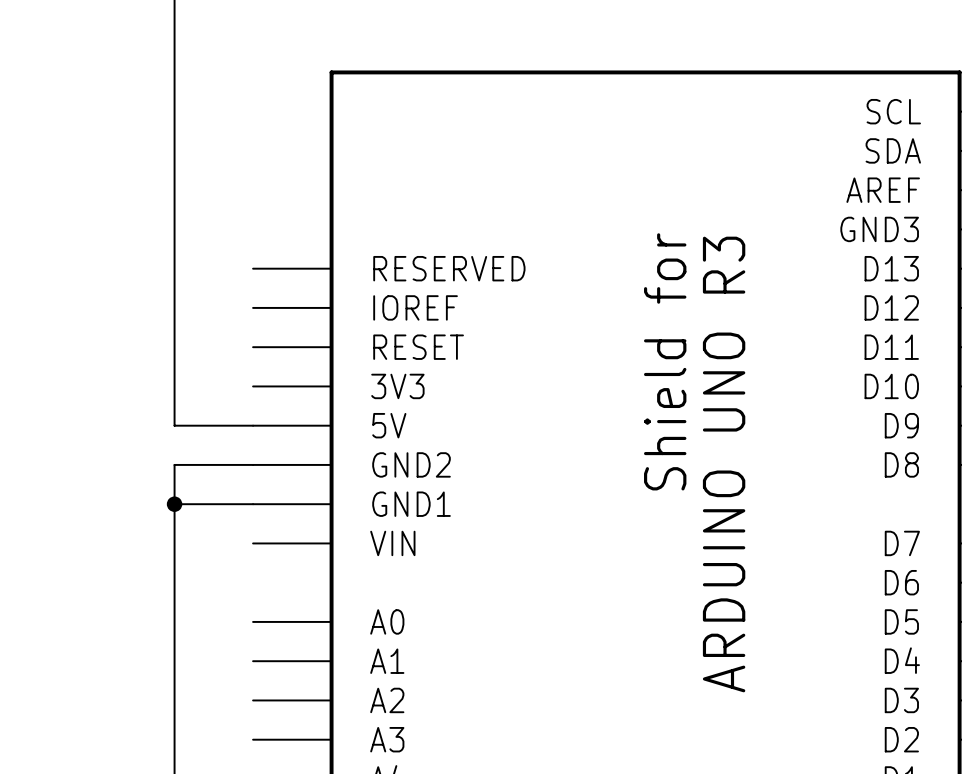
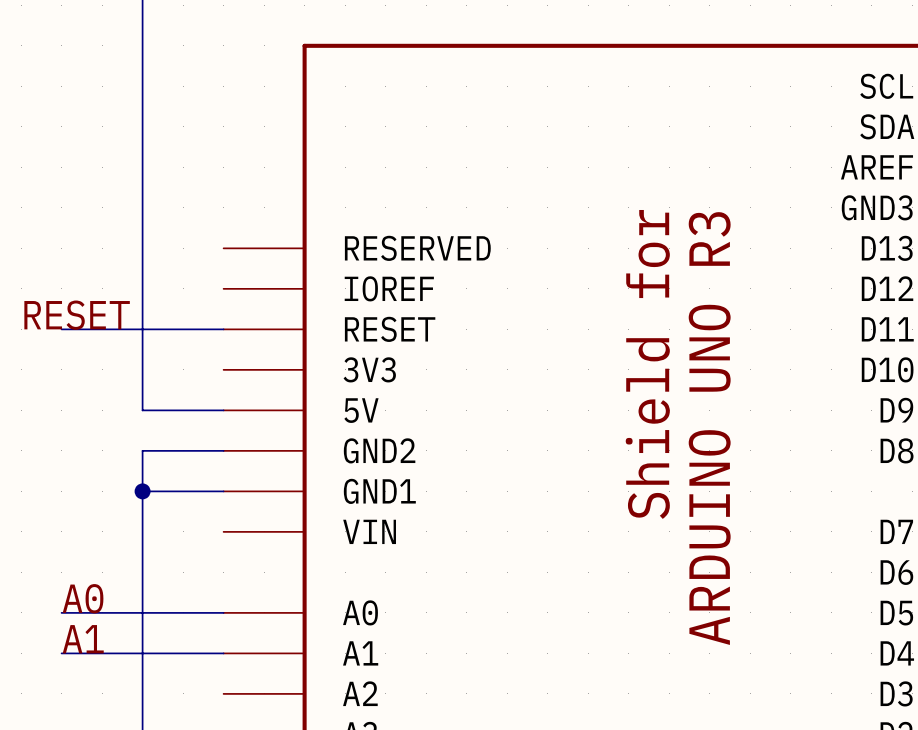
label: none -> RESET (77, 315)
wire: none -> (61, 329) (223, 329)
label: none -> A0 (83, 598)
wire: none -> (61, 612) (223, 612)
label: none -> A1 (83, 639)
wire: none -> (61, 653) (223, 653)

